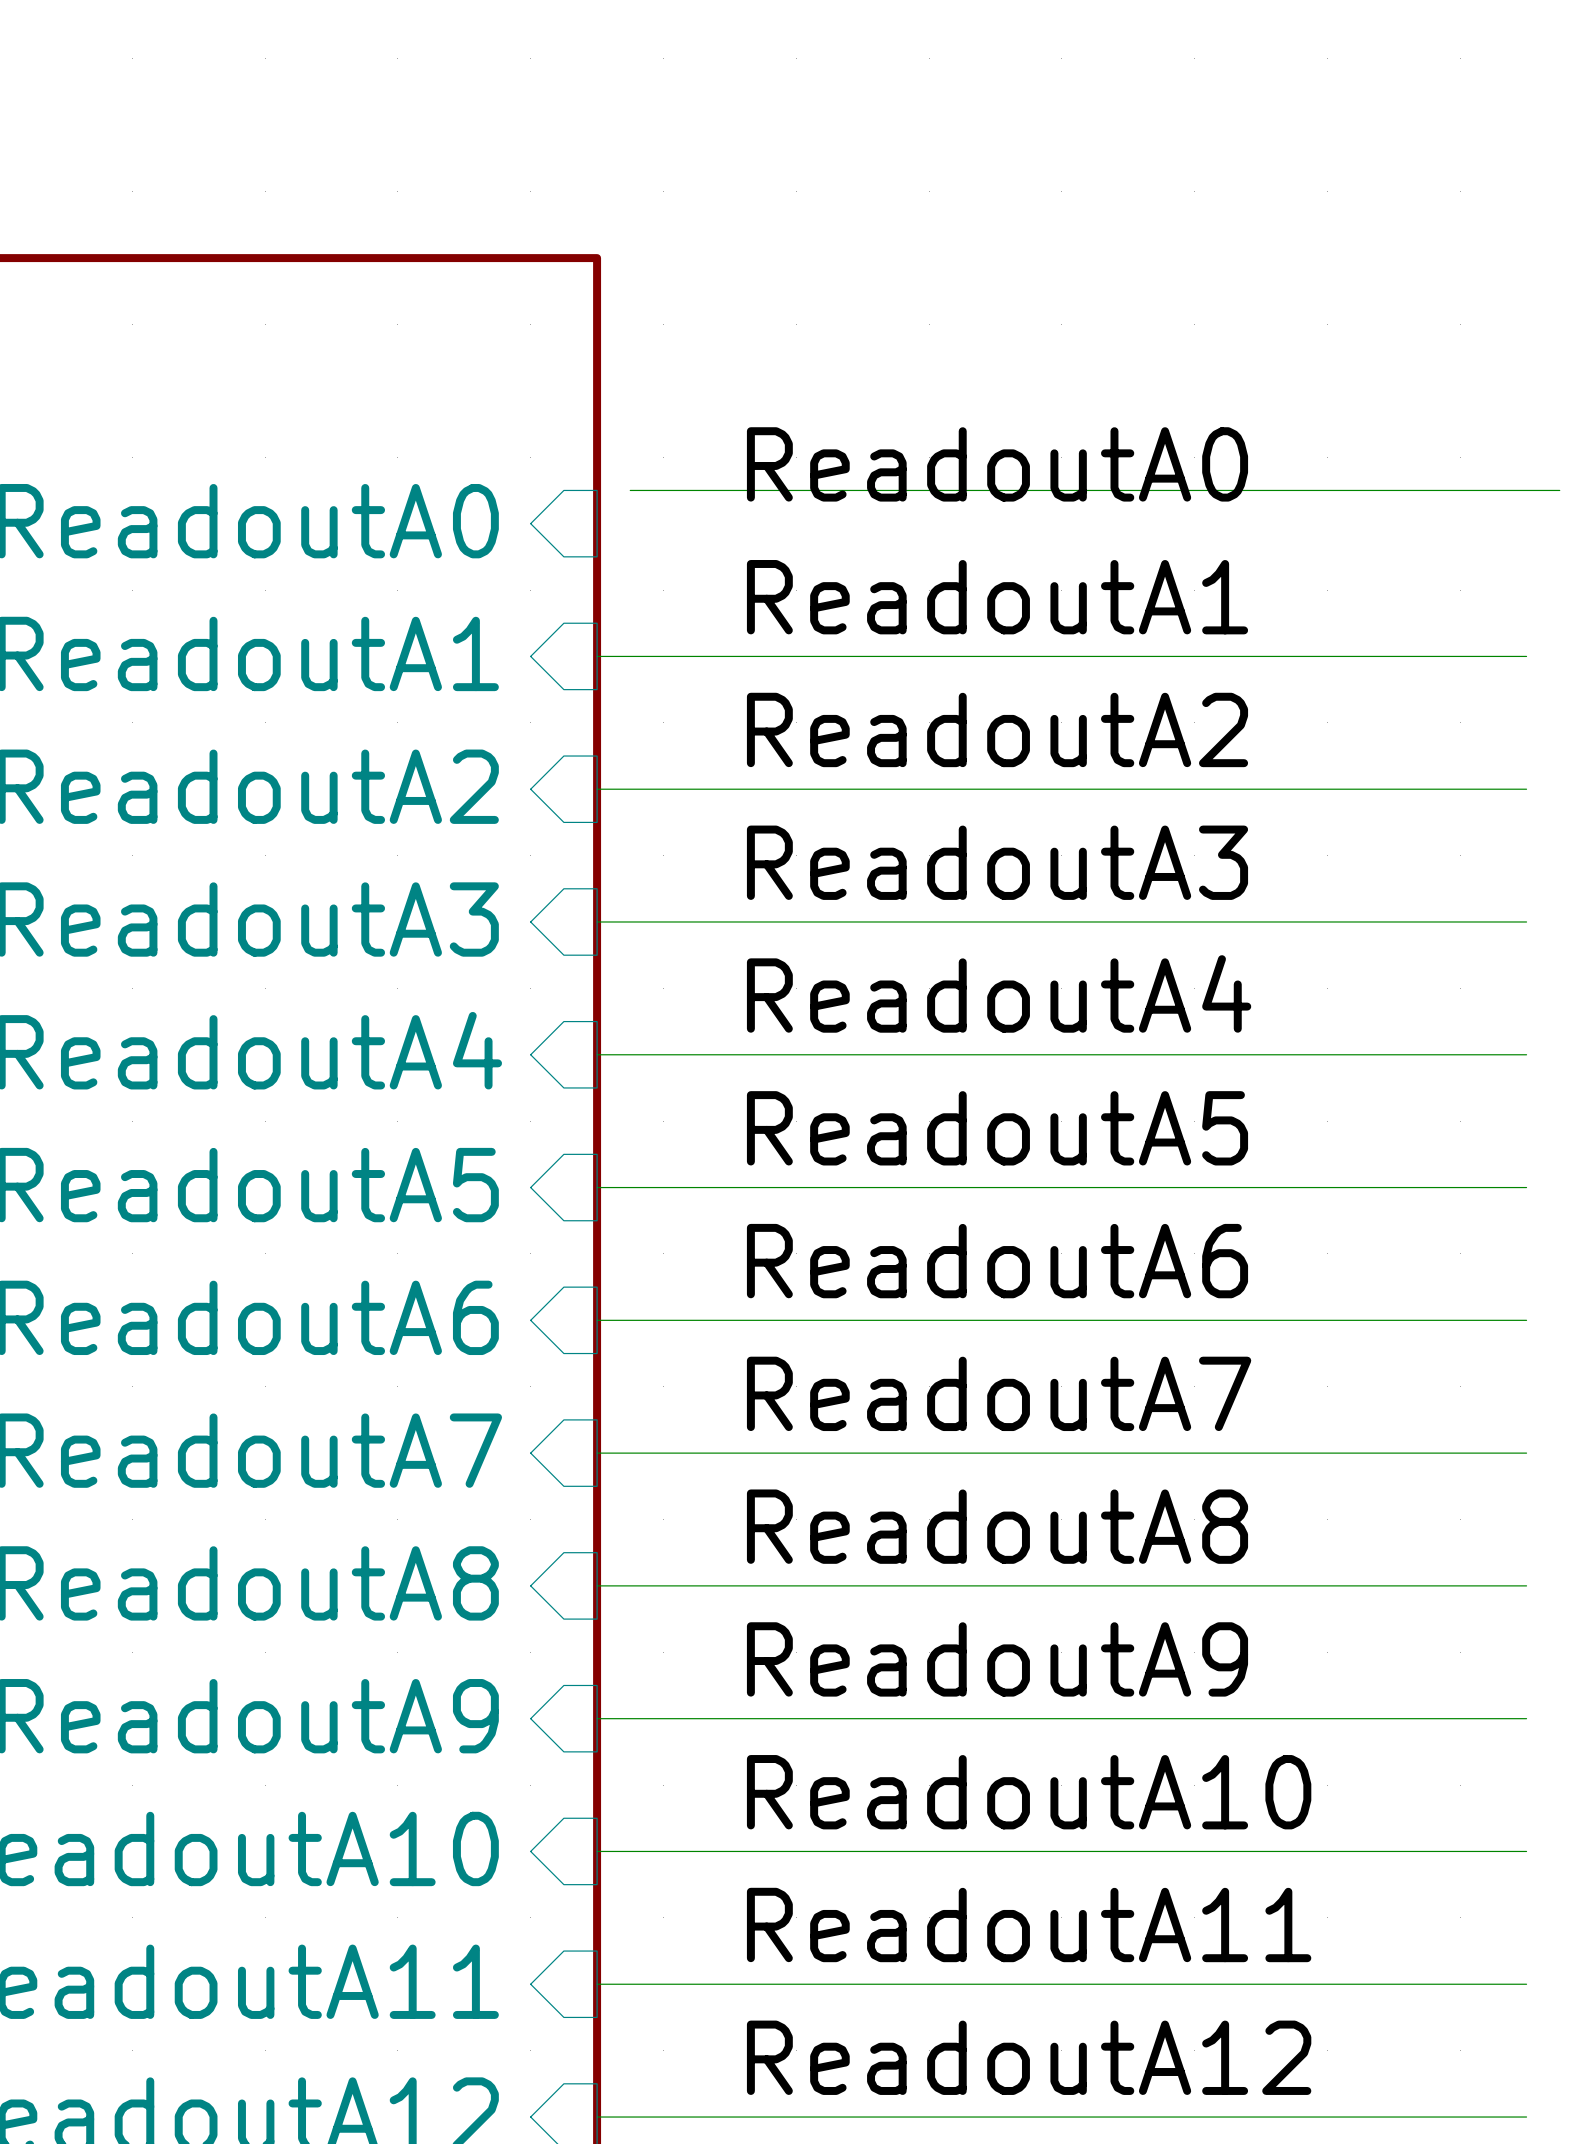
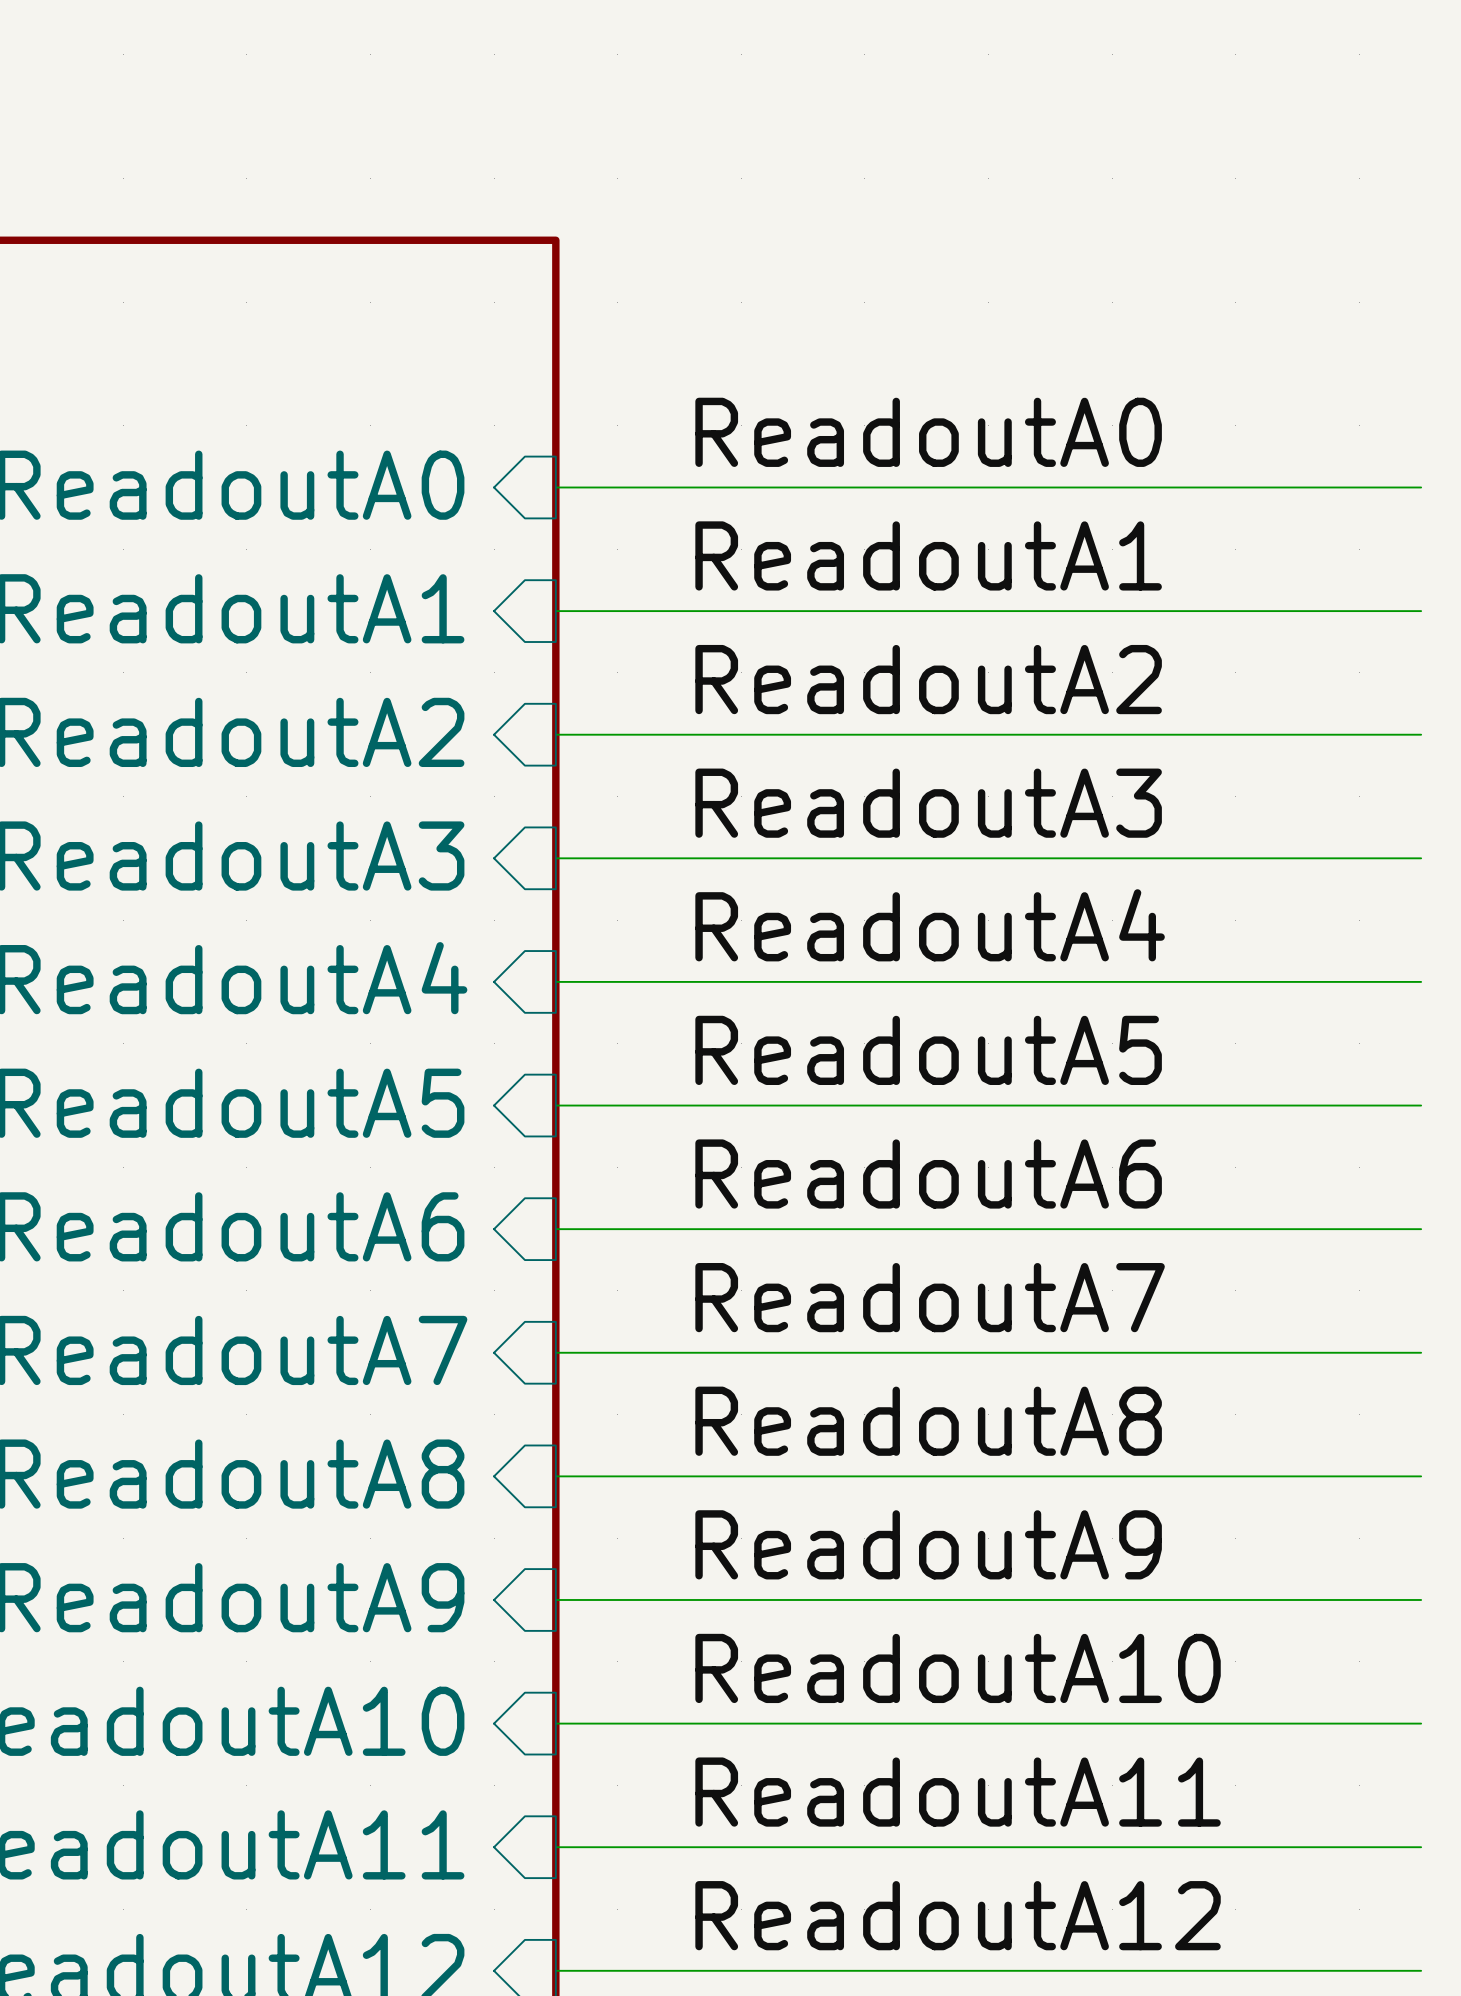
wire: (630, 490) (1559, 490) -> (555, 487) (1421, 487)

